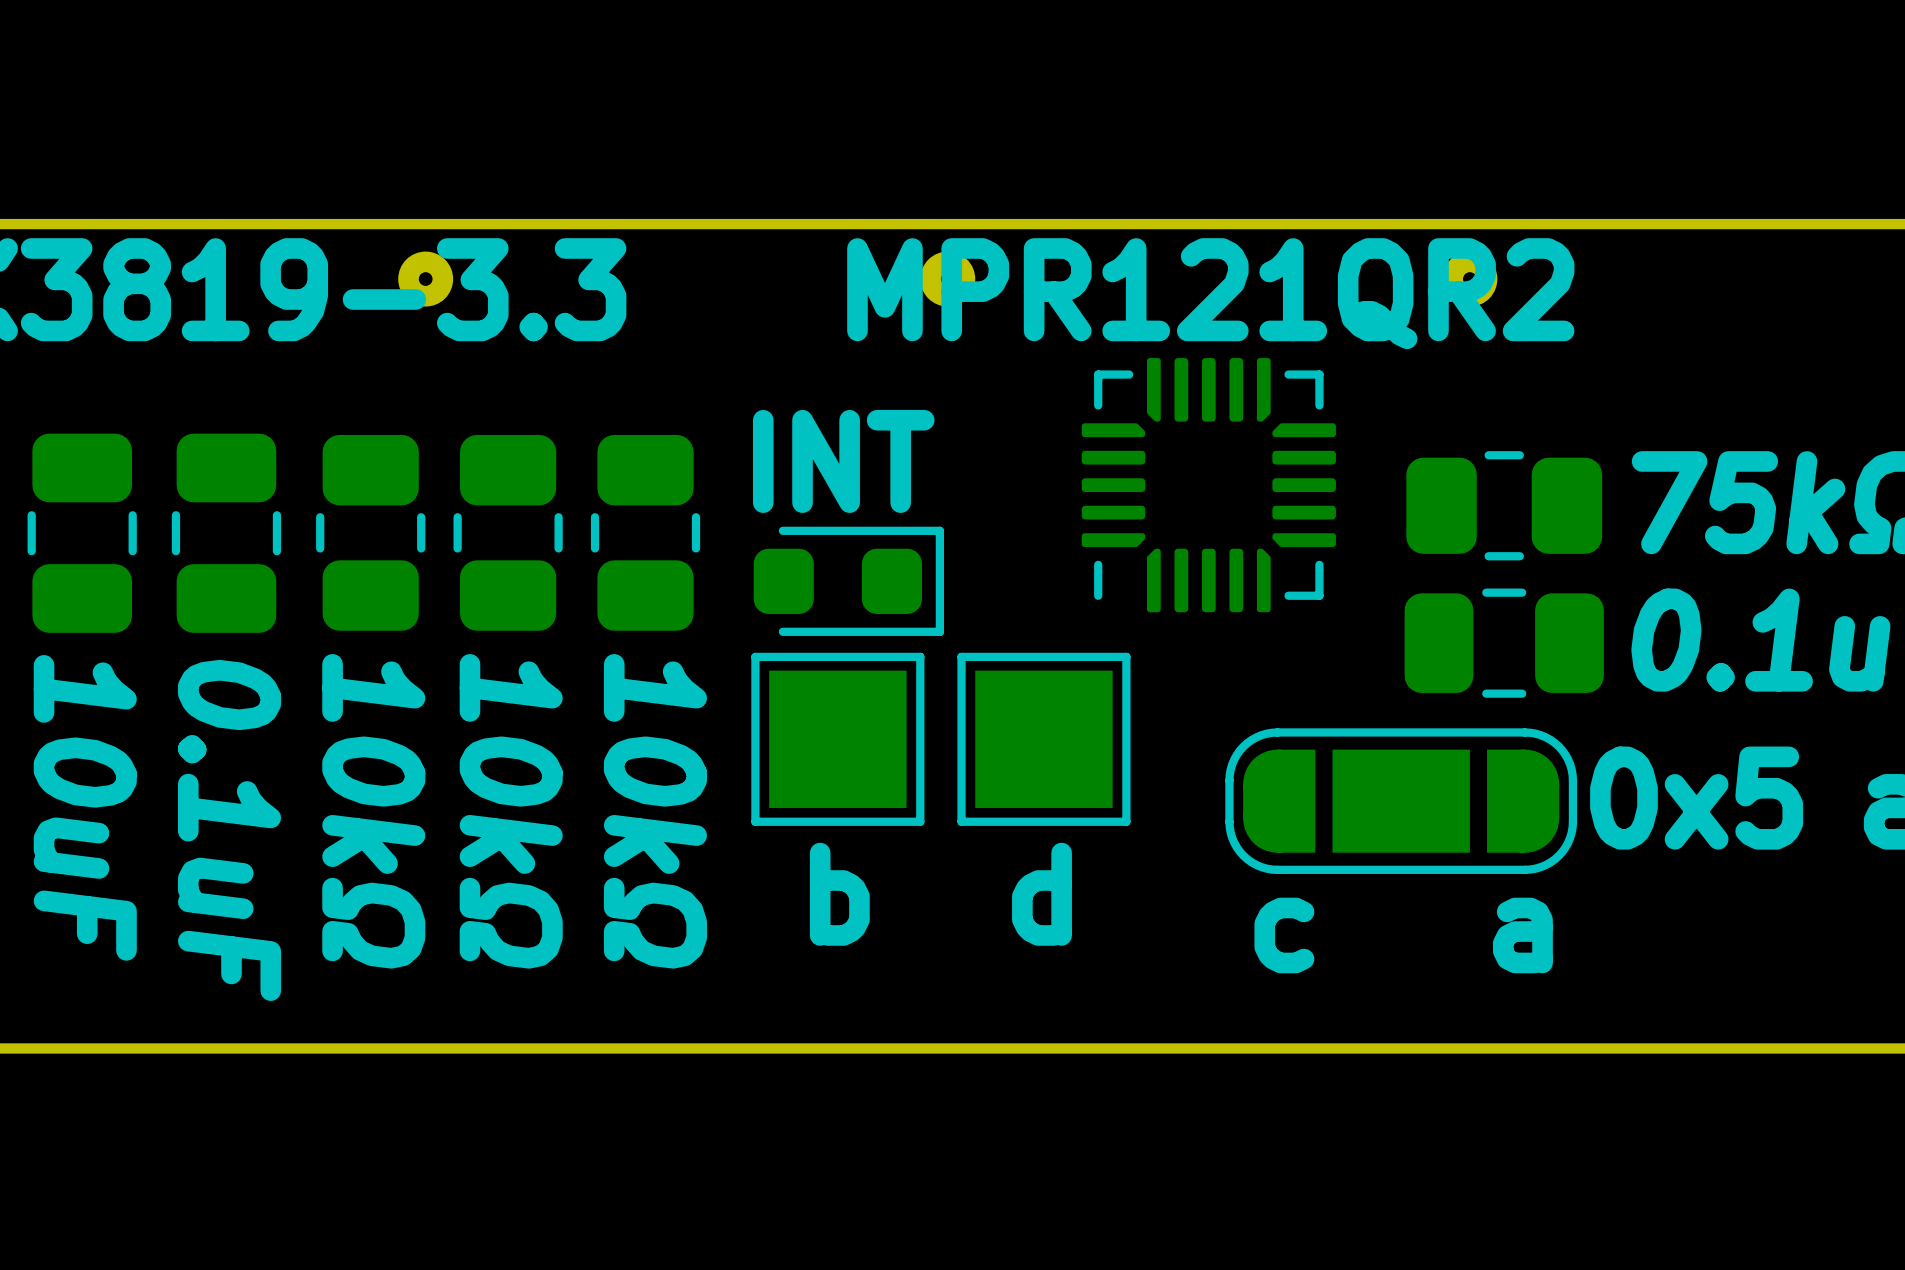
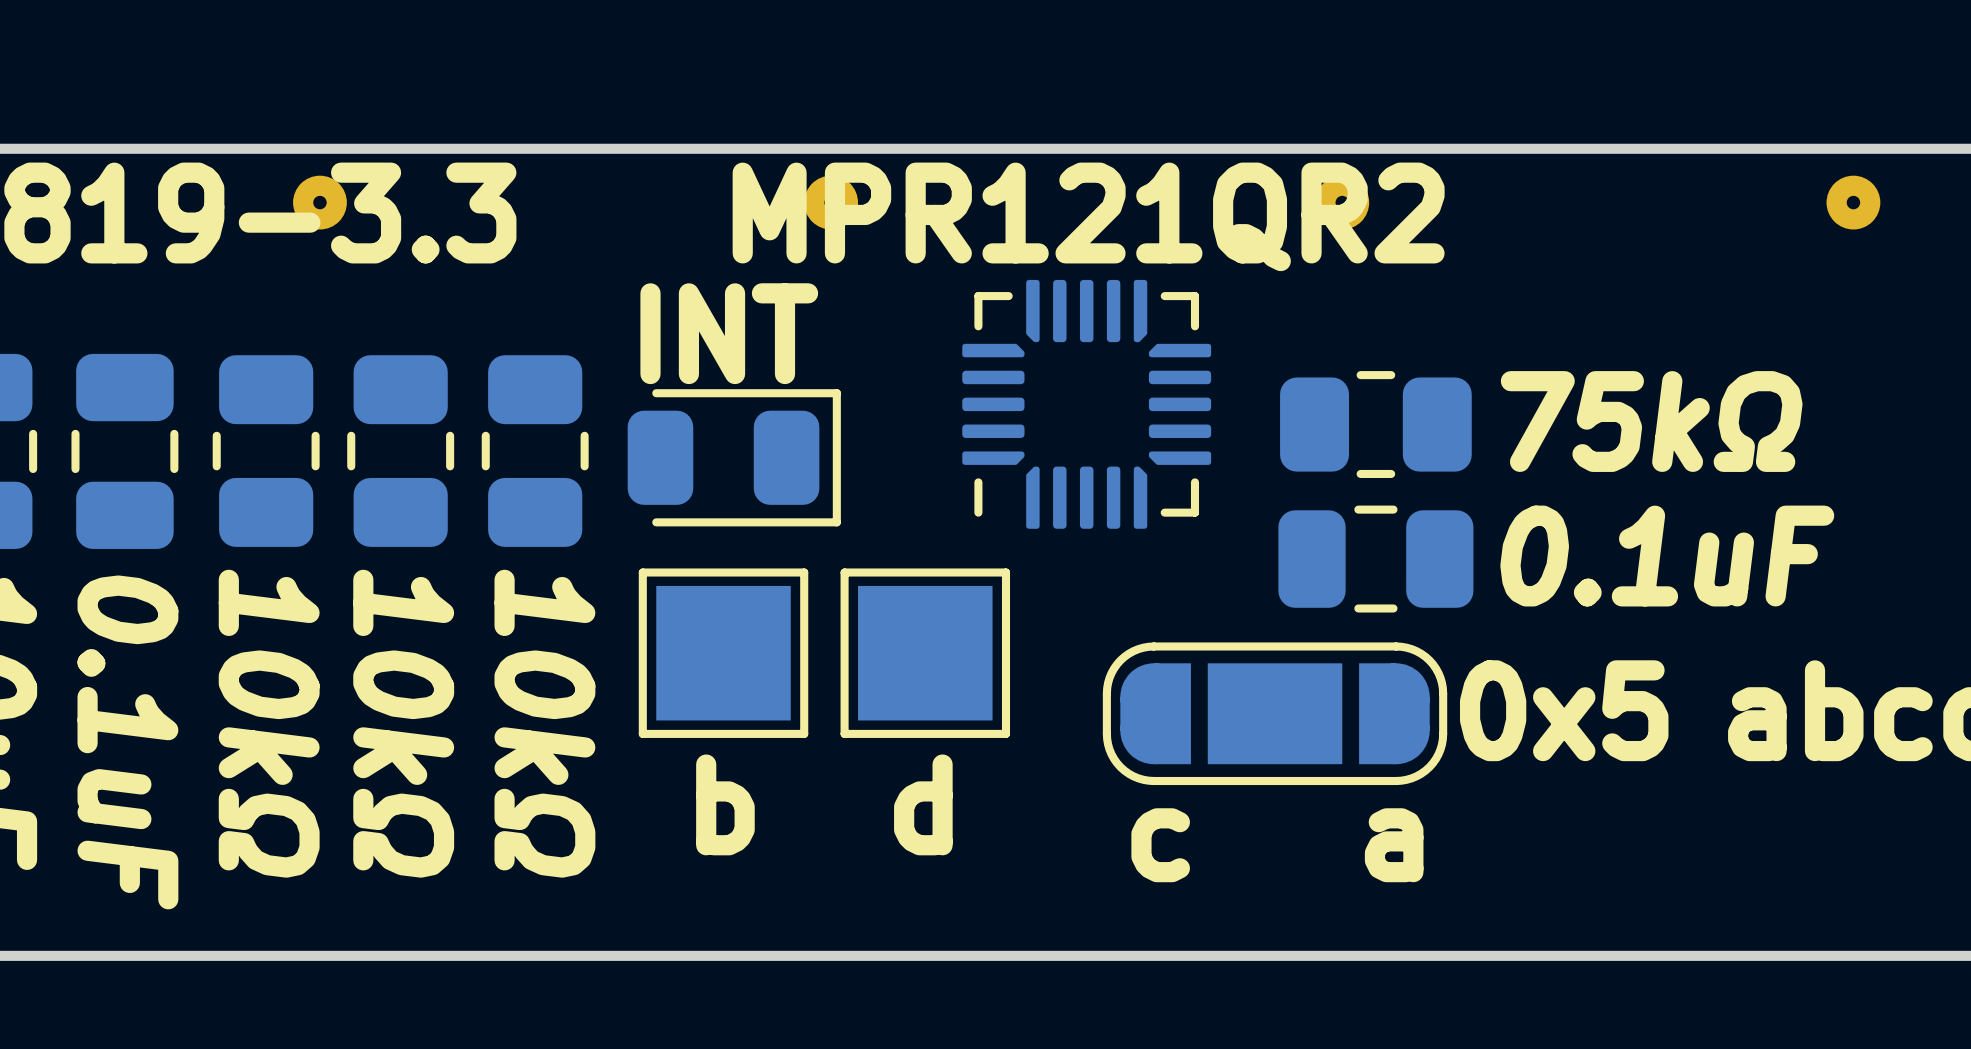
part value position: INT (843, 461) -> INT (729, 333)
part footprint: [753, 526, 945, 636] -> [627, 389, 841, 527]

